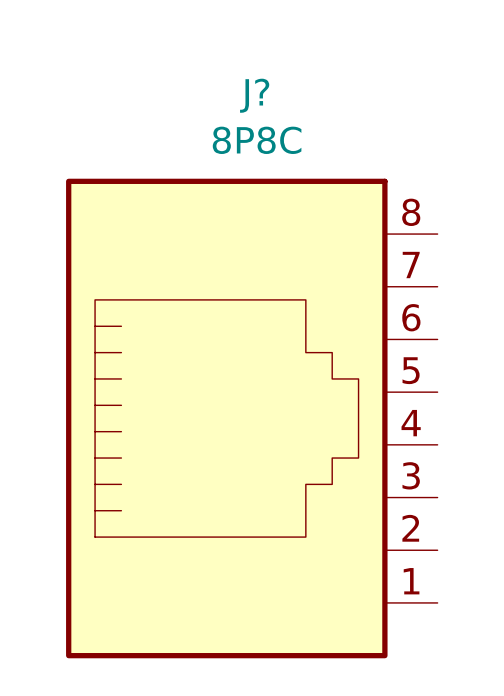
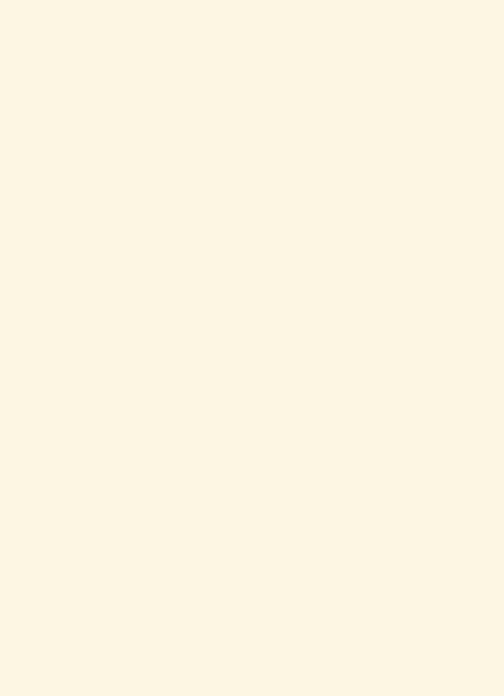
J?: 8P8C (251, 418) -> none

